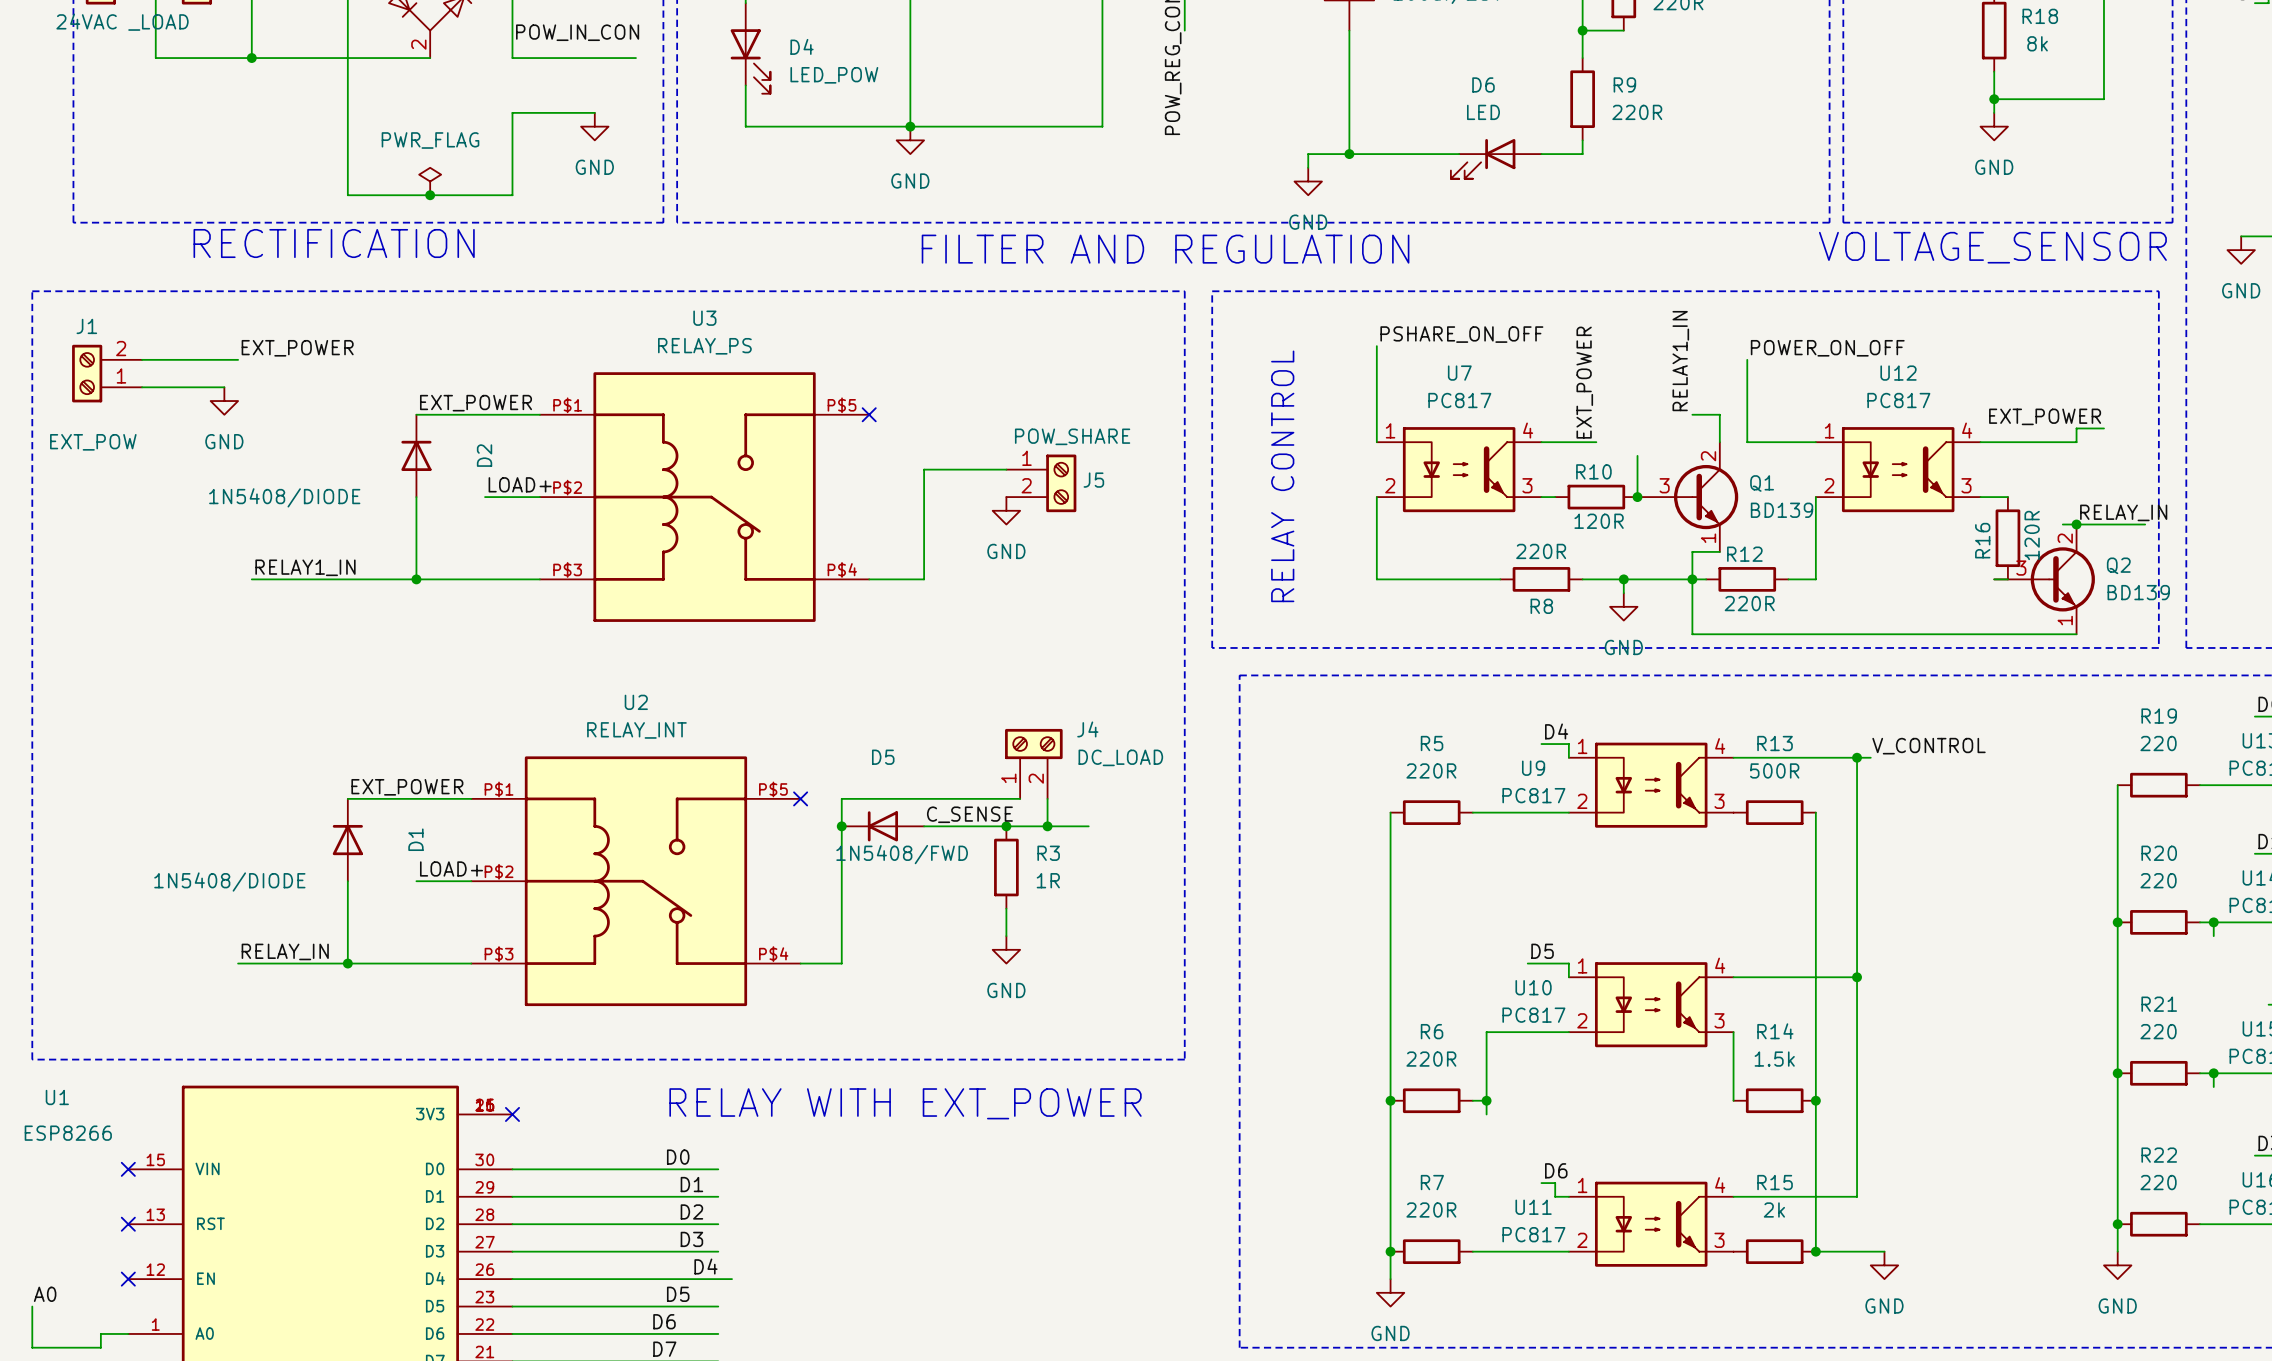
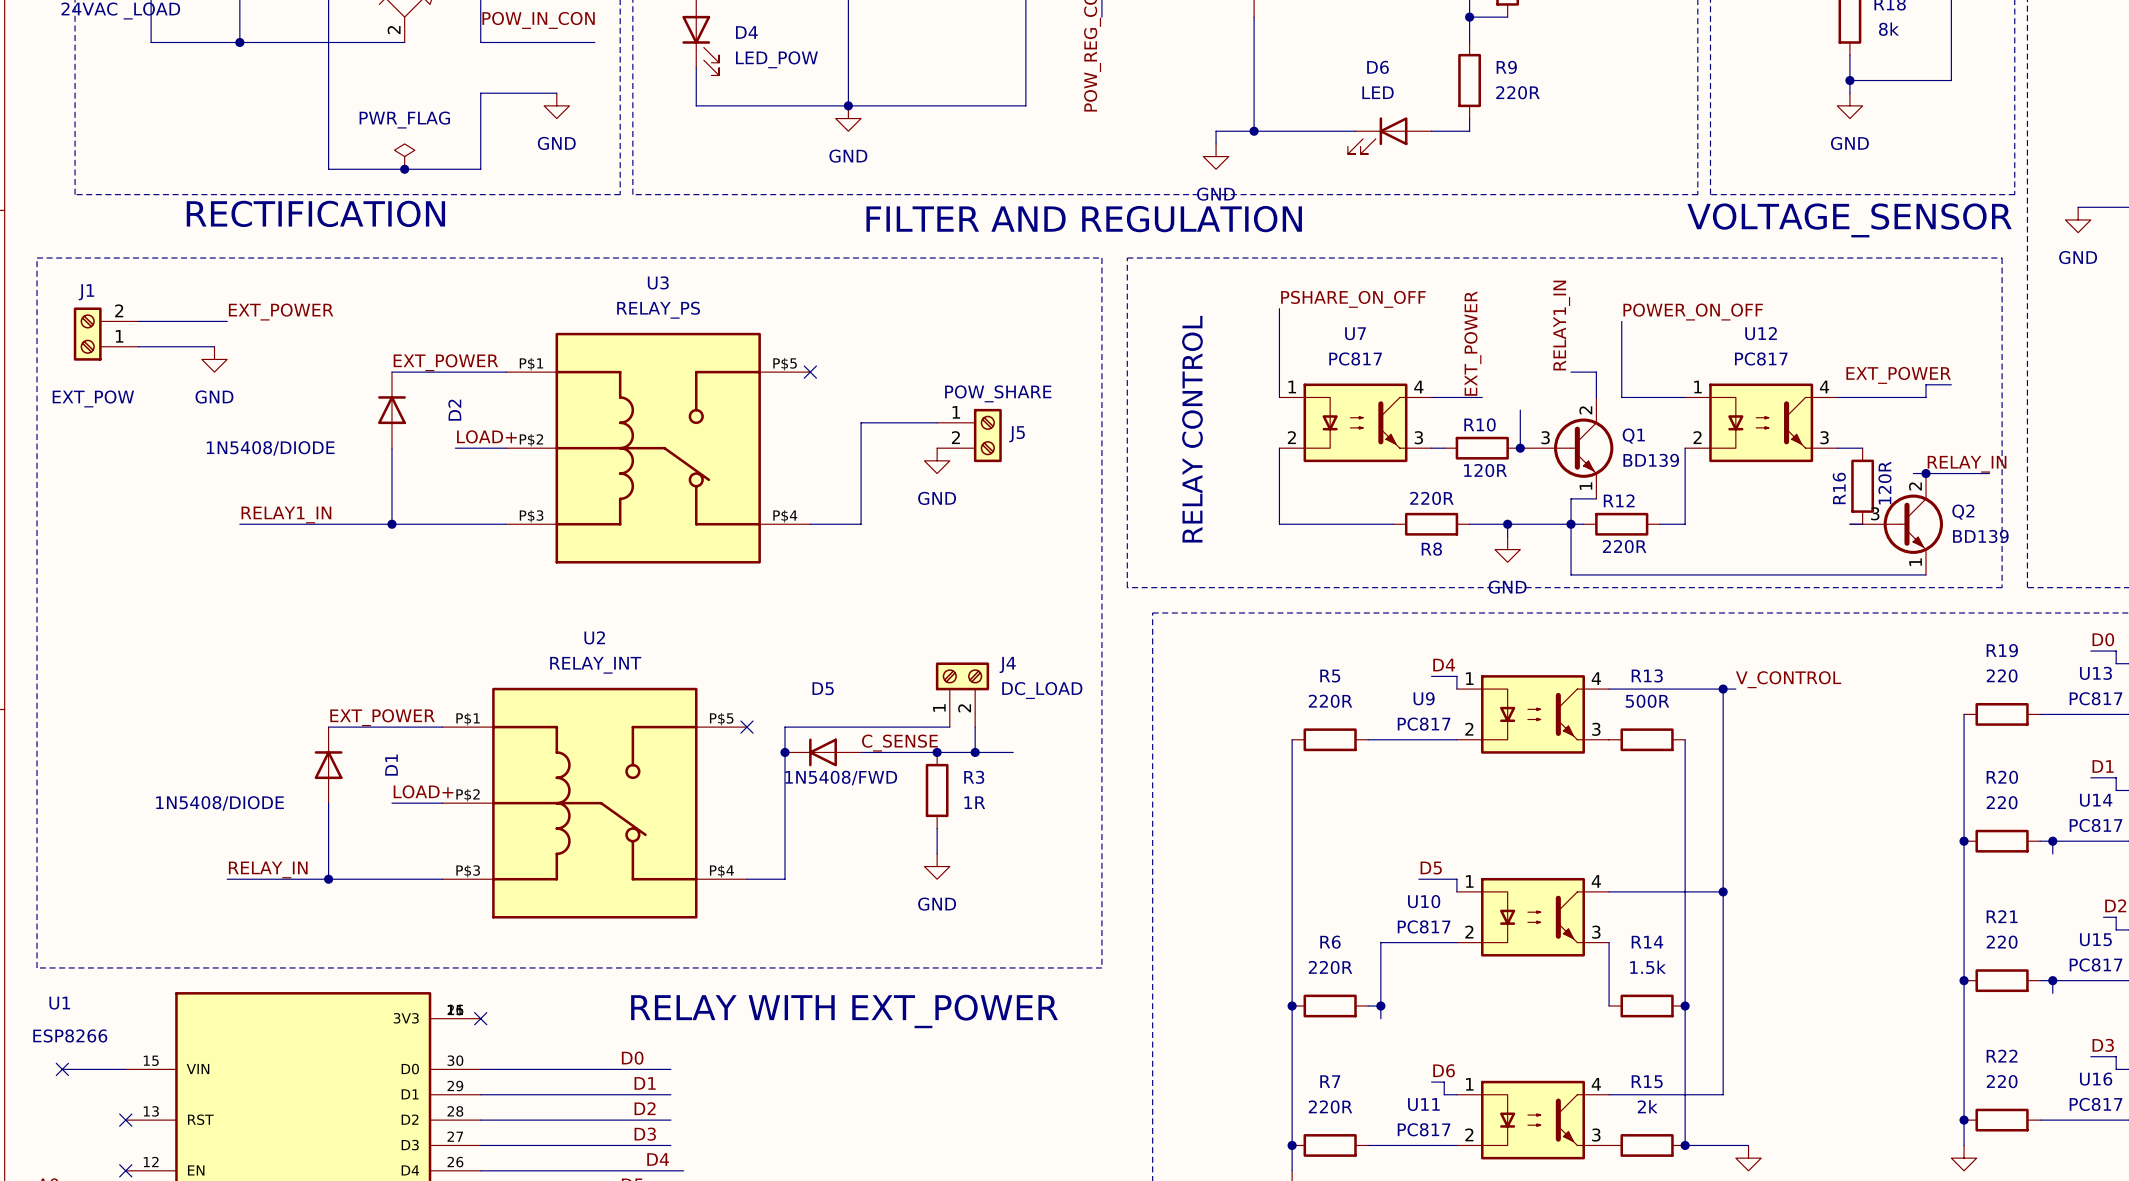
wire: none -> (62, 1069) (125, 1069)
no-connect mark: none -> (62, 1069)
no-connect mark: (128, 1169) -> none

